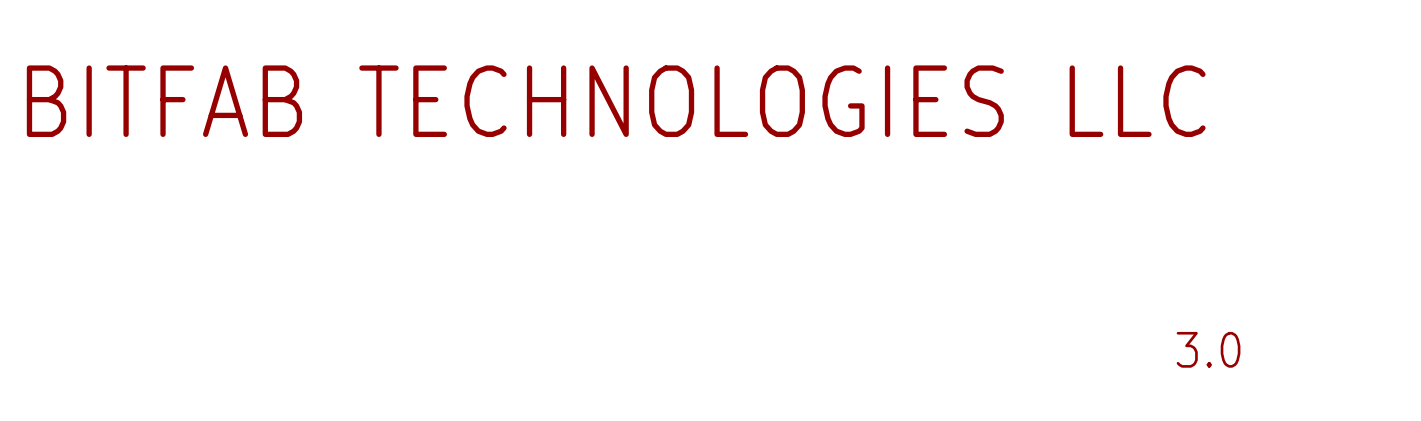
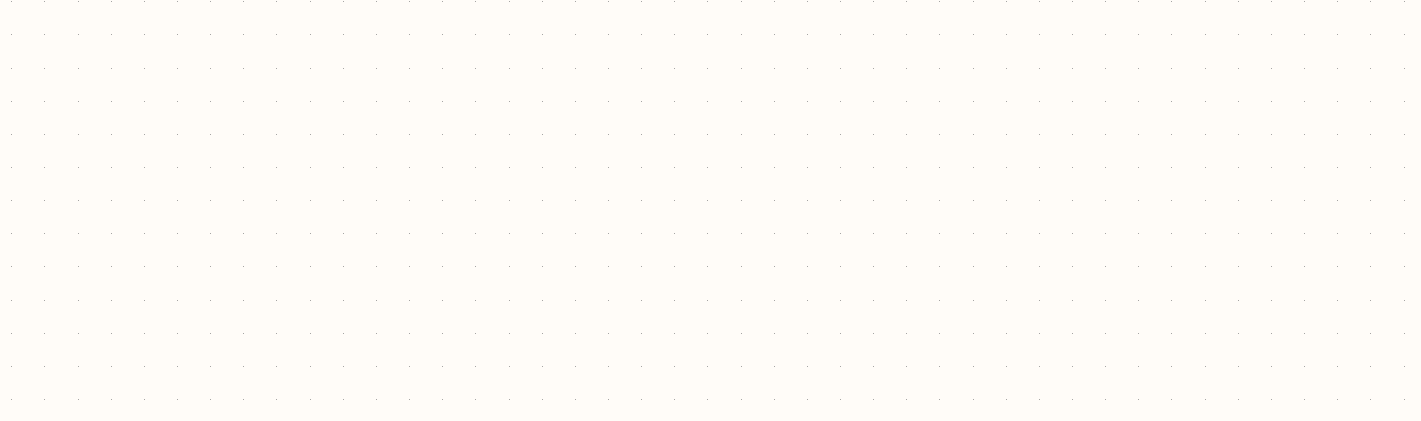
text: BITFAB TECHNOLOGIES LLC (616, 101) -> none
text: 3.0 (1208, 349) -> none

